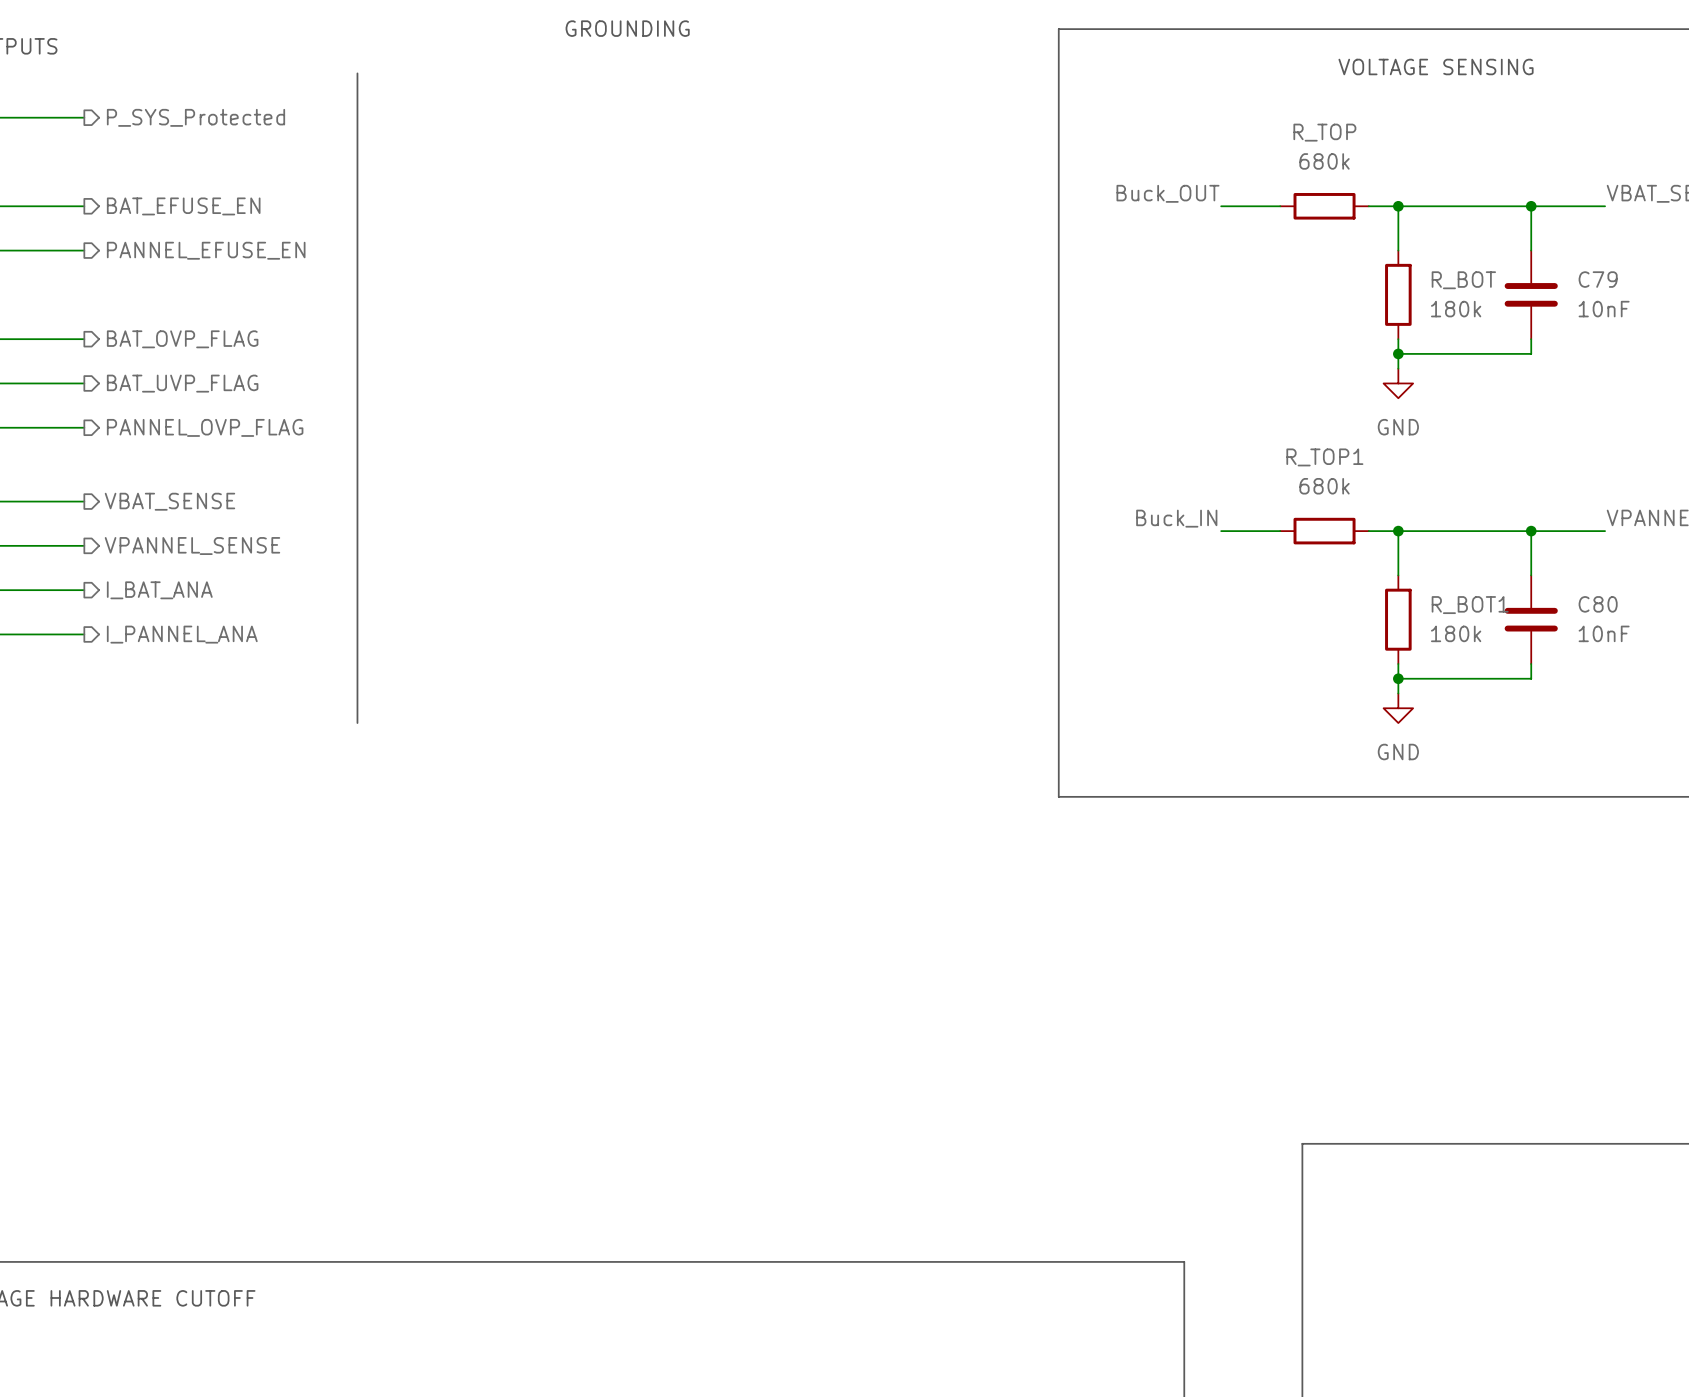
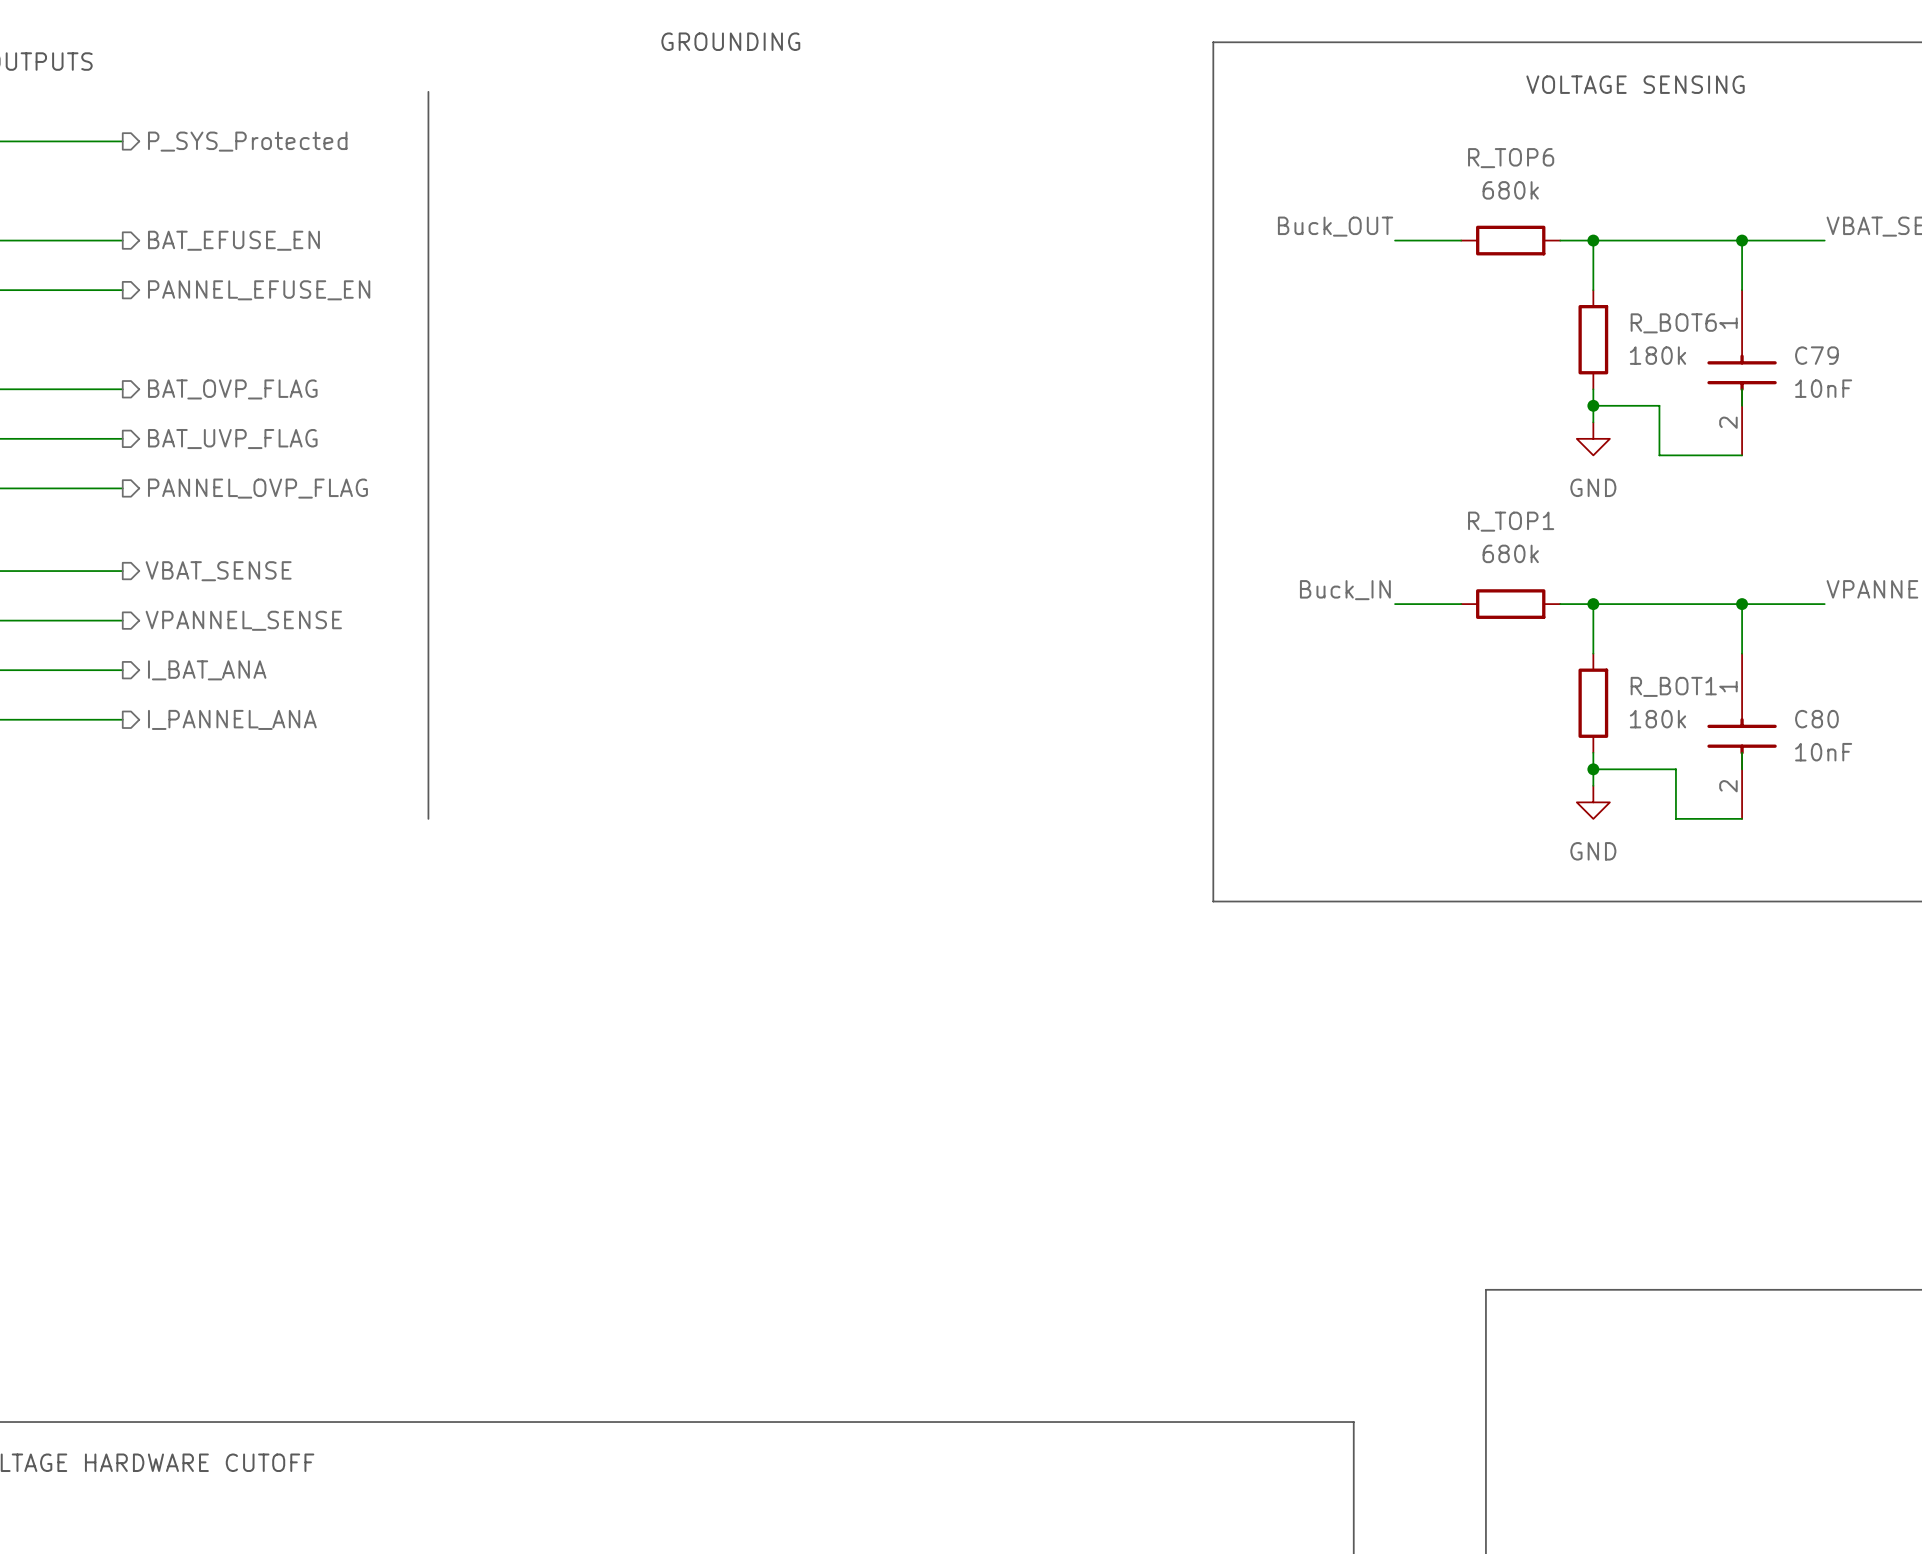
R_TOP name: R_TOP (1324, 132) -> R_TOP6 (1511, 158)
C79 symbol: [1504, 250, 1558, 340] -> [1707, 290, 1777, 456]
R_BOT name: R_BOT (1463, 280) -> R_BOT6 (1673, 323)
wire: (1457, 353) (1531, 353) -> (1659, 405) (1659, 455) (1742, 455)
C80 symbol: [1504, 575, 1558, 664] -> [1707, 653, 1777, 819]
wire: (1472, 678) (1531, 678) -> (1675, 769) (1675, 818) (1742, 818)

